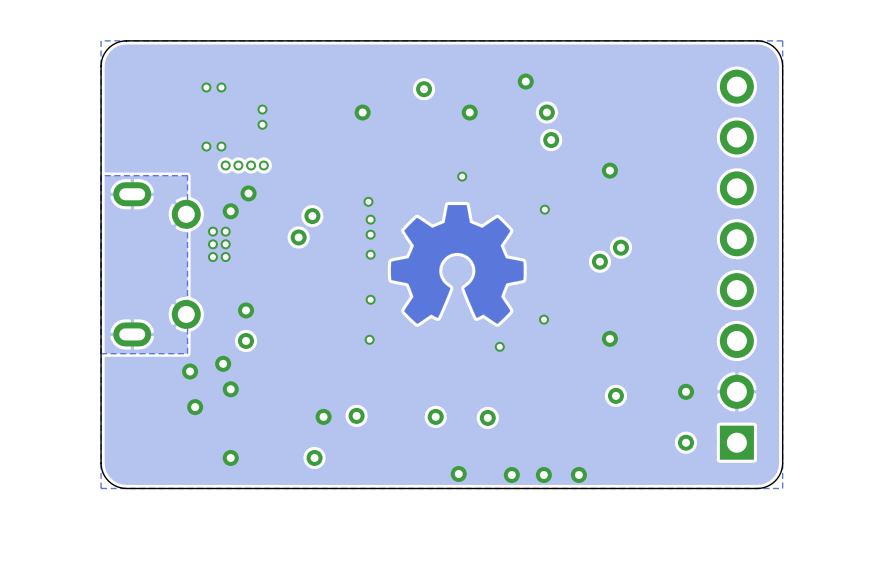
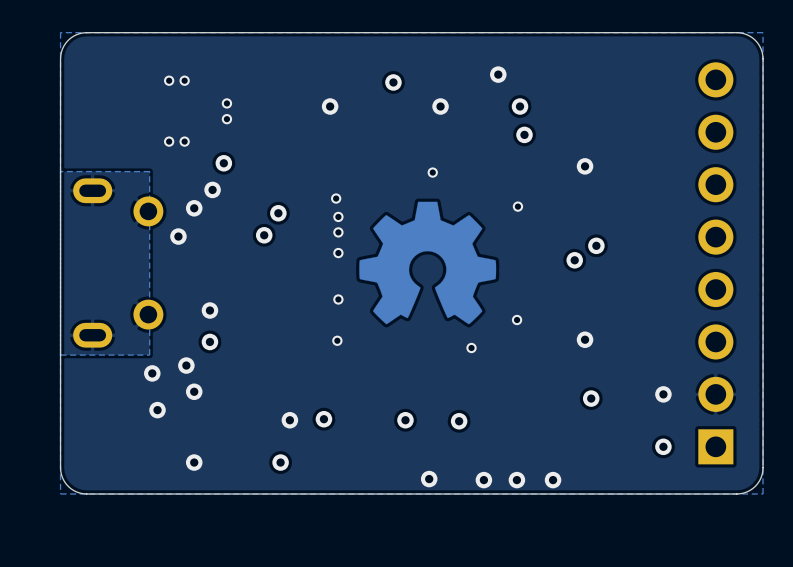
via: (225, 165) -> none
via: (238, 165) -> none
via: (251, 165) -> none
via: (263, 165) -> none
via: none -> (223, 163)
via: (212, 231) -> none
via: (225, 231) -> none
via: none -> (178, 236)
via: (212, 244) -> none
via: (225, 244) -> none
via: (212, 257) -> none
via: (225, 257) -> none

